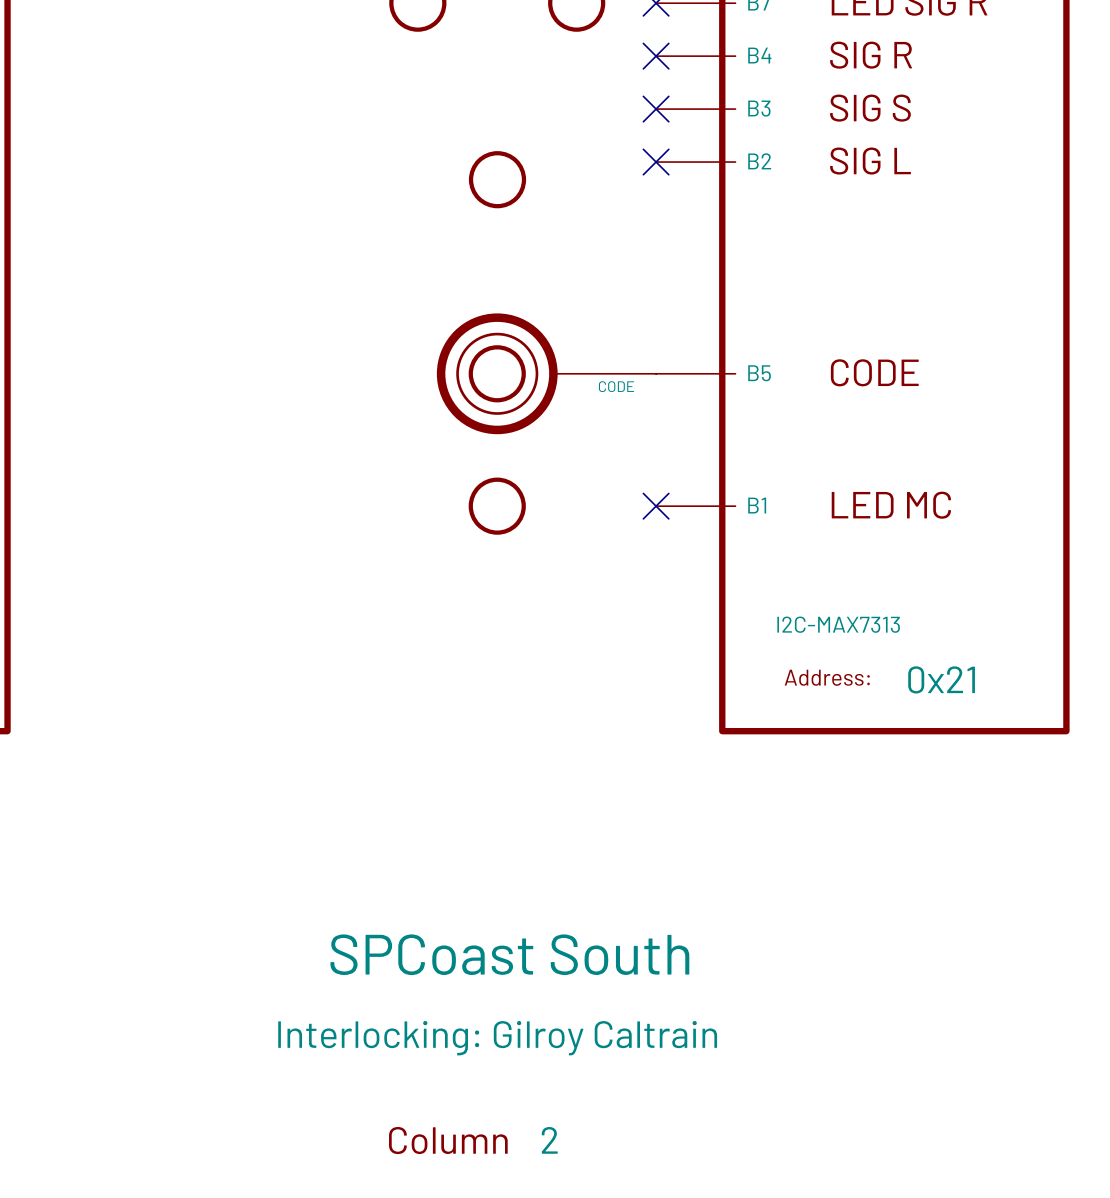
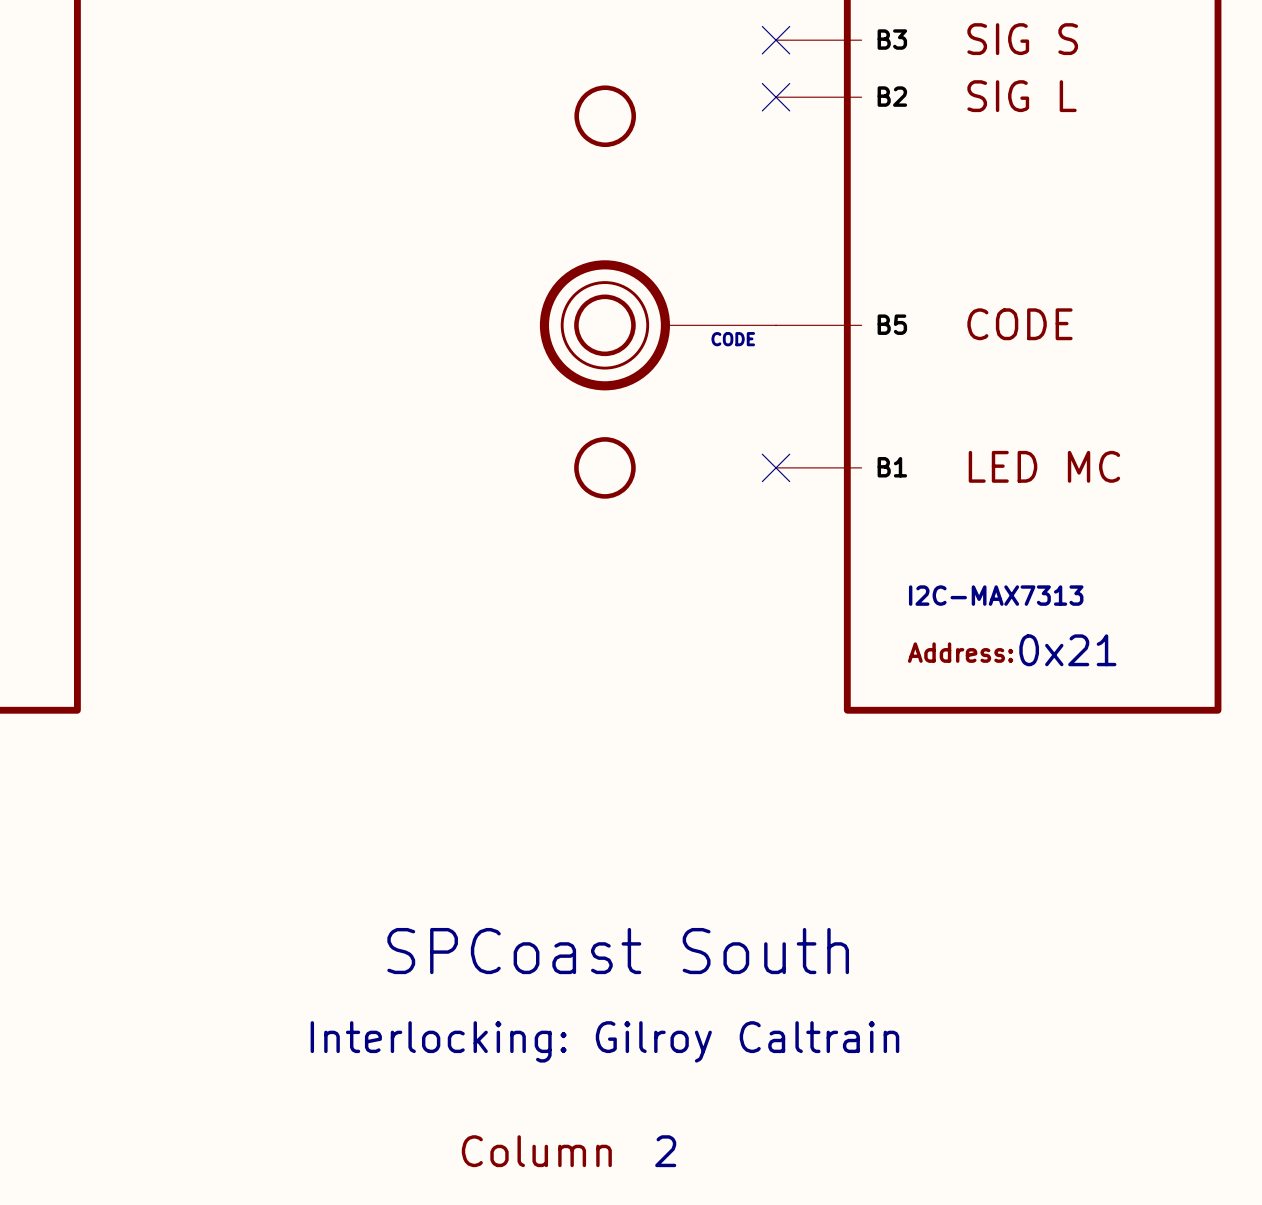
part text position: 0x21 (941, 679) -> 0x21 (1067, 650)

